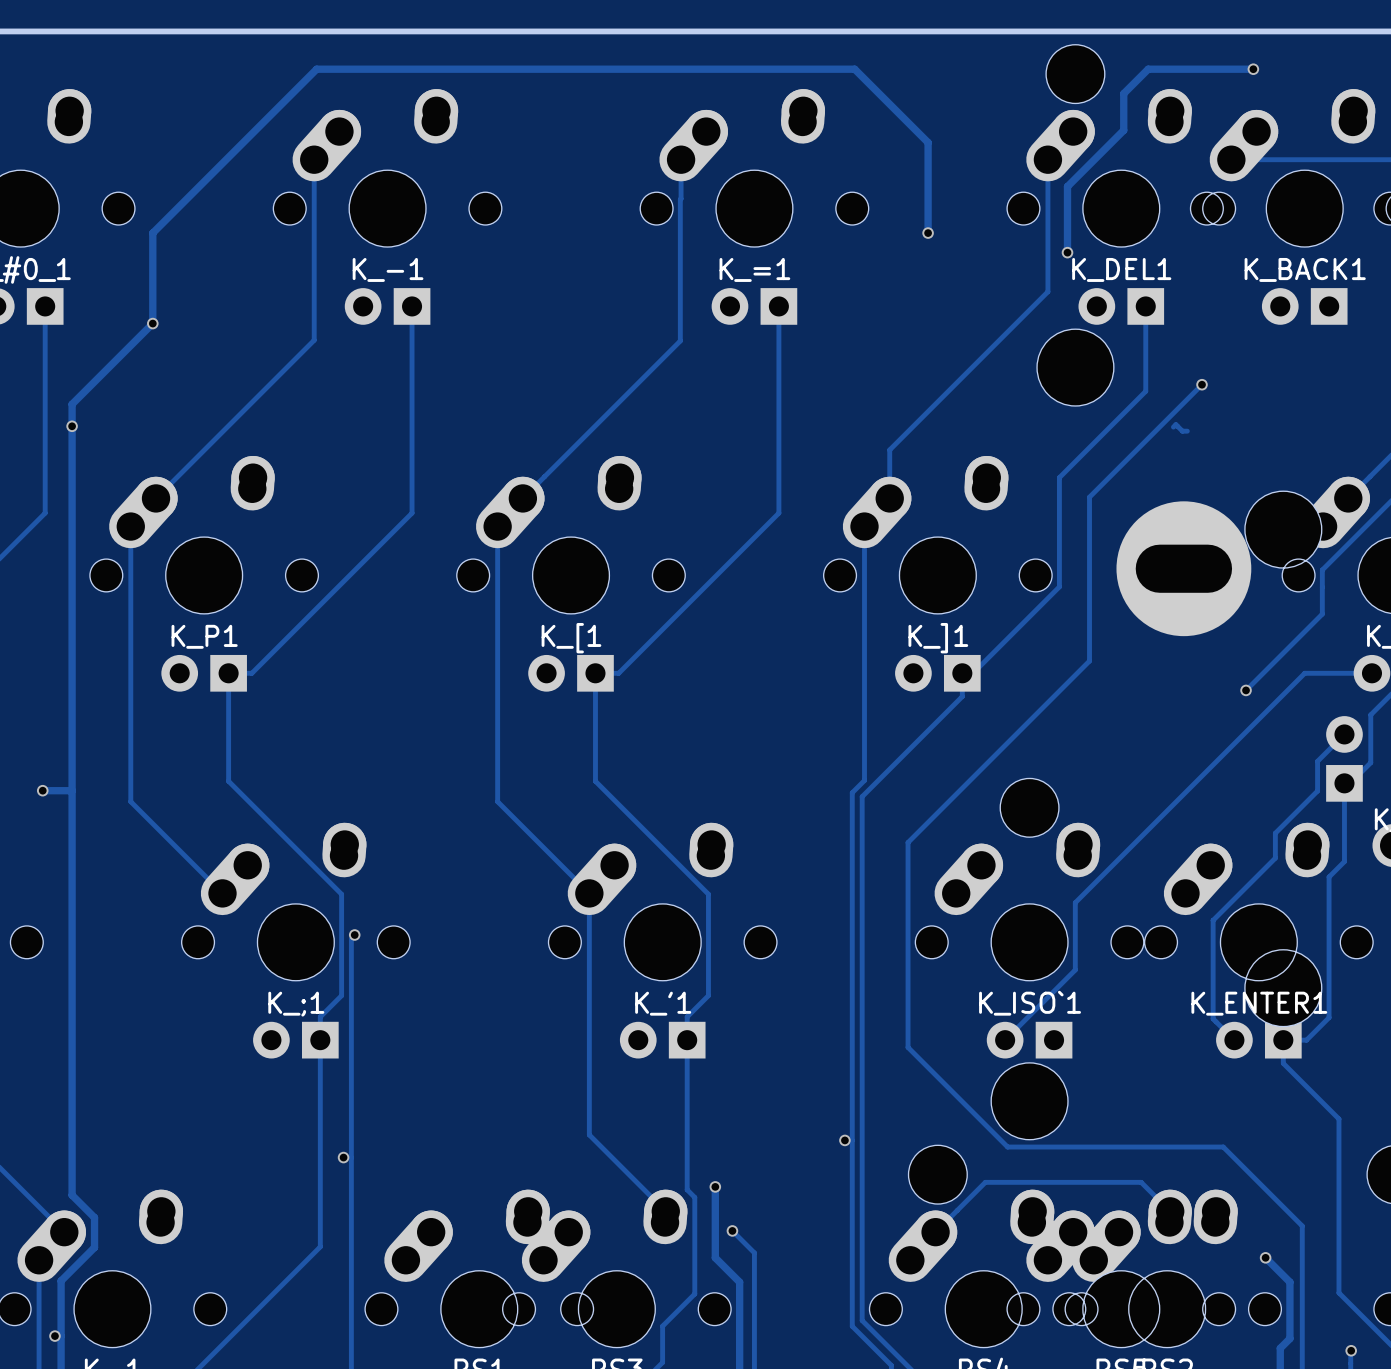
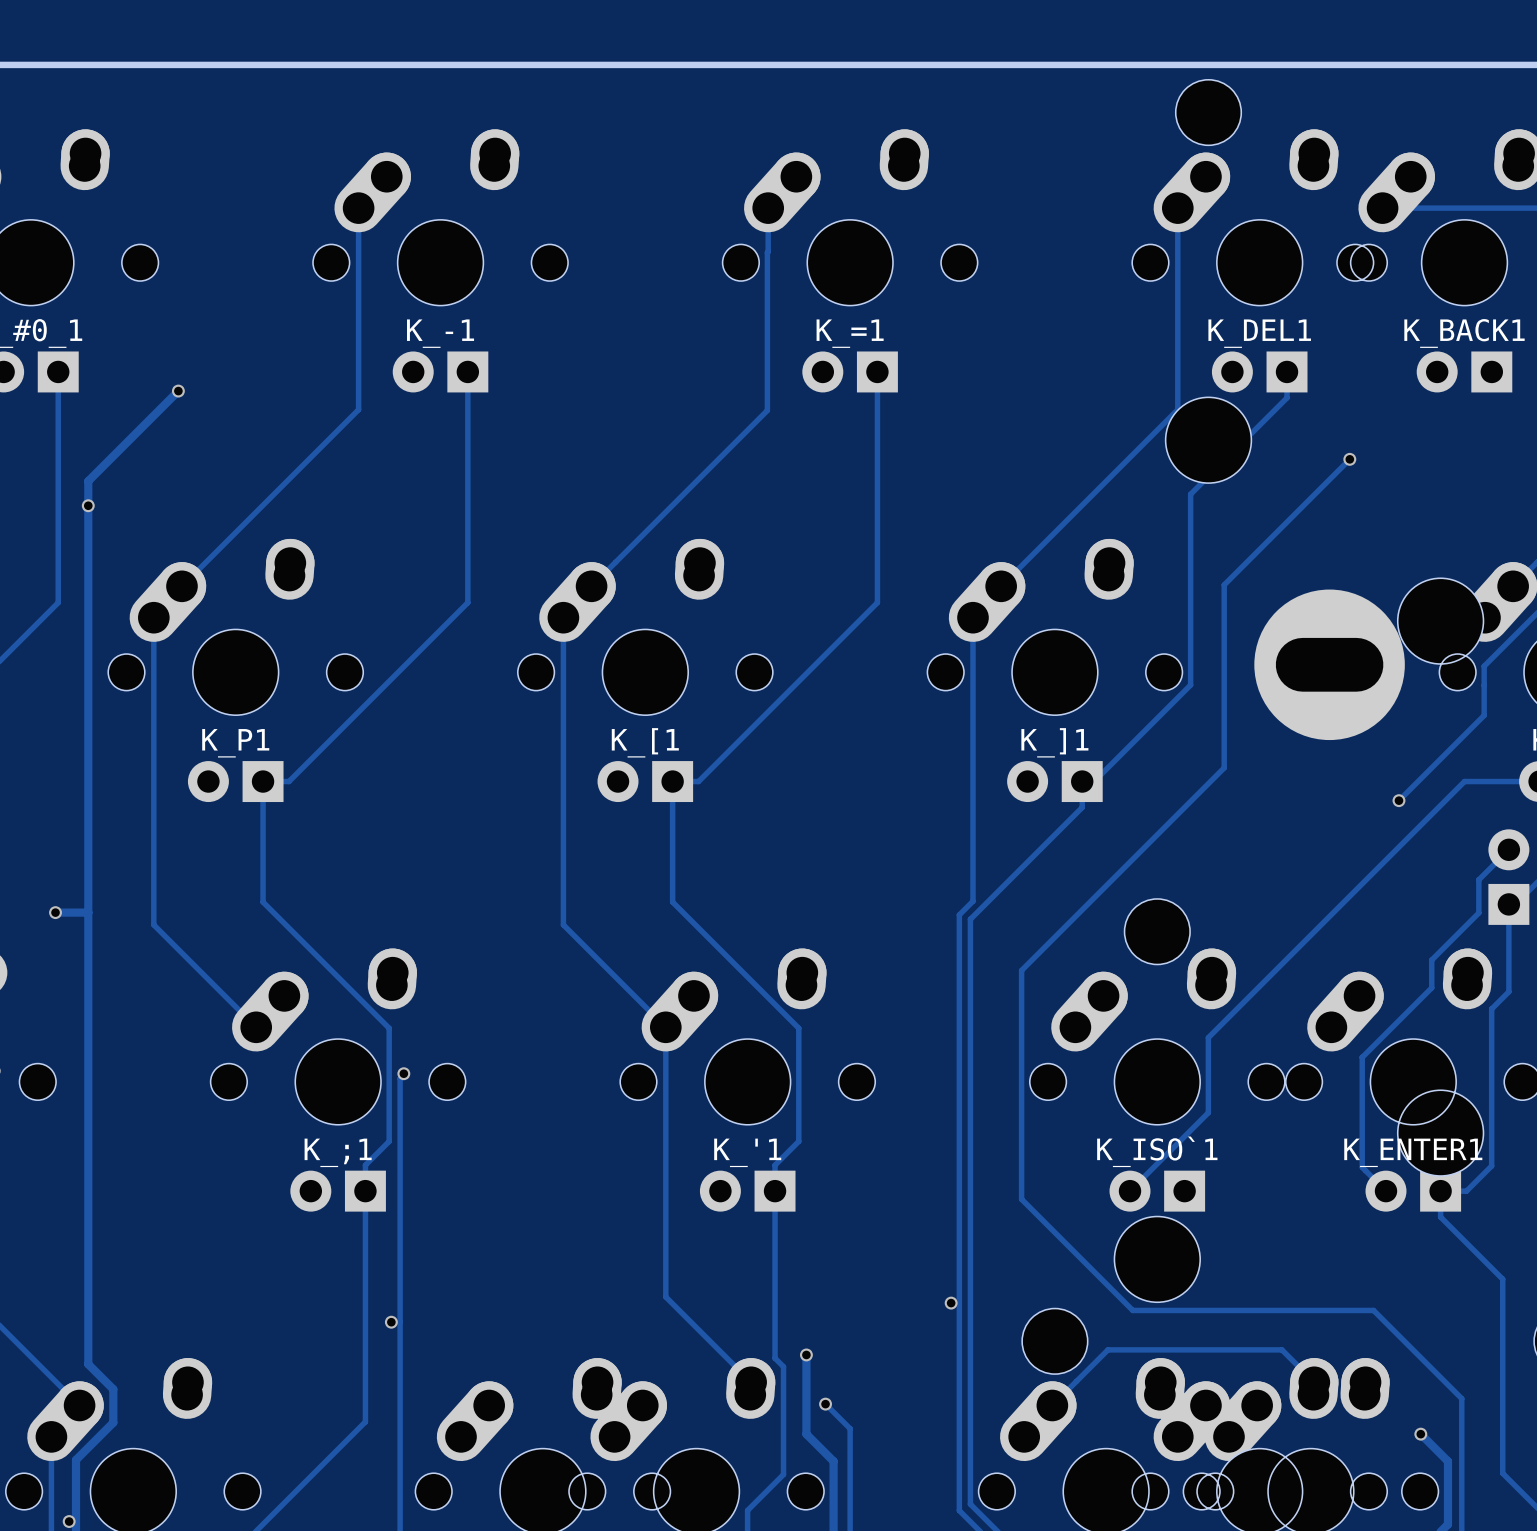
track: (1253, 69) (1148, 69) (1123, 93) (1123, 130) (1067, 186) (1067, 252) -> none
via: (1253, 69) -> none
track: (928, 233) (928, 142) (854, 69) (316, 69) (152, 233) (152, 323) -> none
via: (928, 233) -> none
via: (1067, 252) -> none
track: (1047, 291) (889, 449) (889, 498) -> (1177, 355) (1177, 409) (1001, 586)
track: (1145, 329) (1145, 391) (1059, 477) -> (1287, 397) (1190, 494) (1190, 563)
track: (1173, 427) (1175, 424) (1182, 431) (1187, 431) -> none

